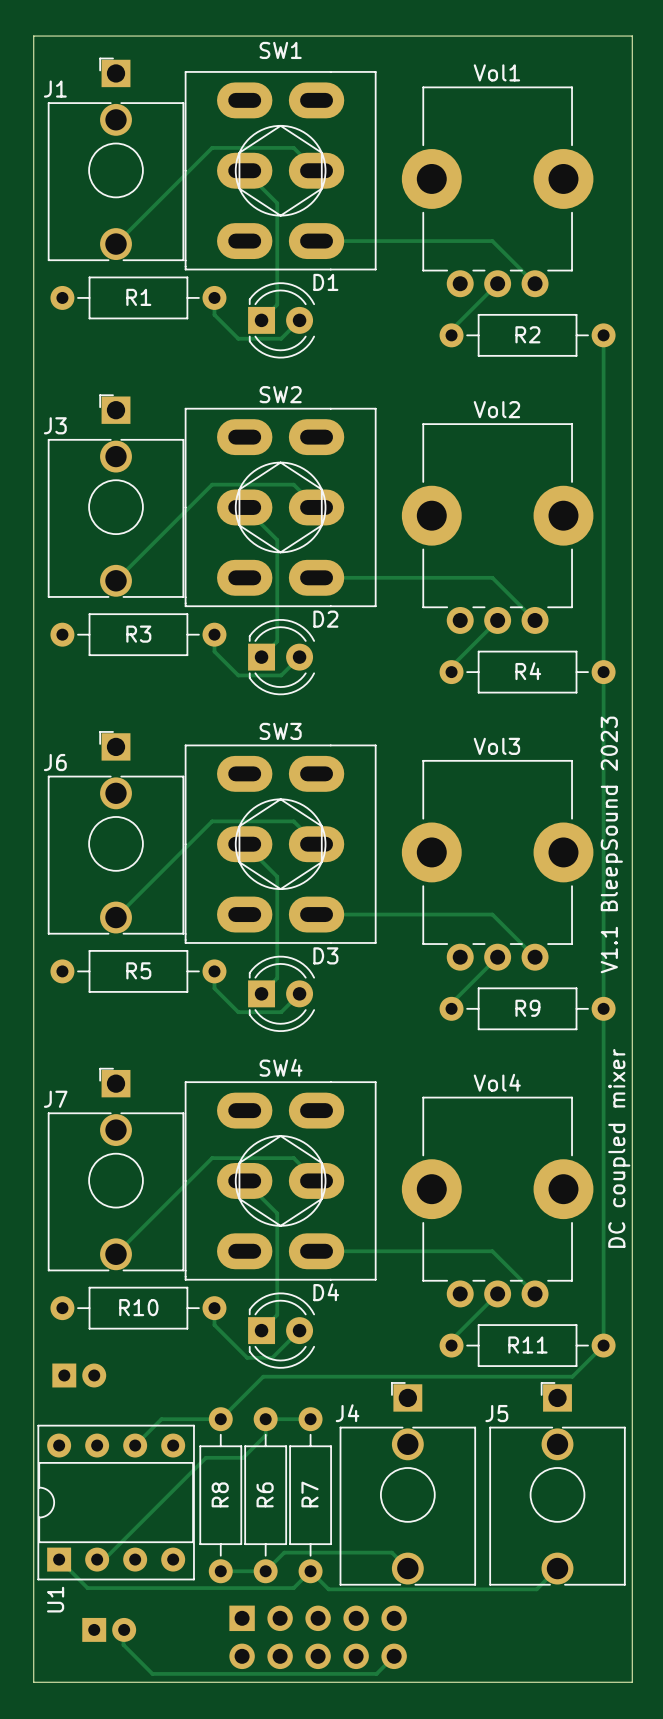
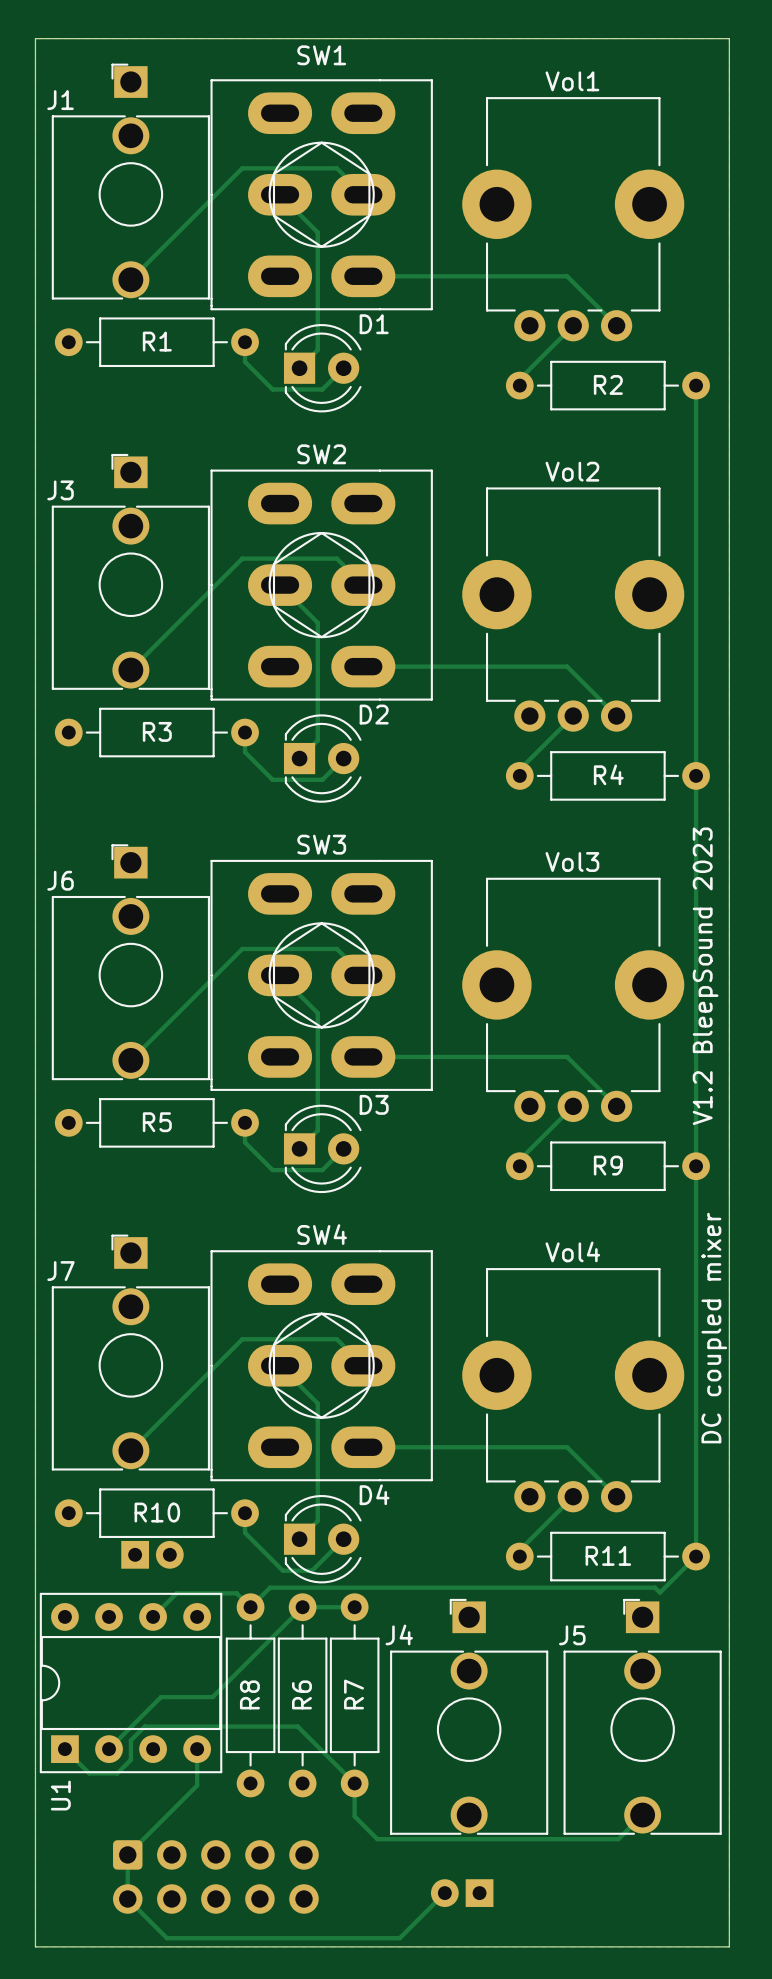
text: V1.1 BleepSound 2023 (611, 844) -> V1.2 BleepSound 2023 (705, 976)
part position: (79, 1375) -> (152, 1554)
track: (572, 1376) (263, 1376) (220, 1419) (161, 1419) (135, 1445) -> (659, 1592) (655, 1587) (270, 1587) (250, 1607) (236, 1593) (176, 1593) (153, 1616)
track: none -> (354, 1607) (302, 1607) (212, 1697) (161, 1697) (109, 1749)
track: (310, 1419) (265, 1419) (265, 1435) (243, 1457) (205, 1457) (104, 1559) (97, 1559) -> none
R8 position: (220, 1495) -> (250, 1695)
R6 position: (265, 1495) -> (302, 1695)
R7 position: (310, 1495) -> (354, 1695)
U1 position: (116, 1502) -> (131, 1683)
track: none -> (197, 1749) (197, 1785) (127, 1854) (127, 1899) (166, 1938) (399, 1938) (444, 1893)
track: (59, 1559) (87, 1588) (293, 1588) (310, 1571) -> (64, 1749) (89, 1773) (117, 1773) (130, 1759) (130, 1740) (144, 1726) (297, 1726) (354, 1783) (354, 1816) (356, 1818)
track: (407, 1568) (391, 1552) (284, 1552) (265, 1571) (220, 1571) -> none
part: none -> (215, 1876)
part: (109, 1629) -> none
track: (124, 1629) (123, 1644) (152, 1673) (376, 1673) (394, 1656) -> none
part: none -> (462, 1893)
part: (318, 1637) -> none

